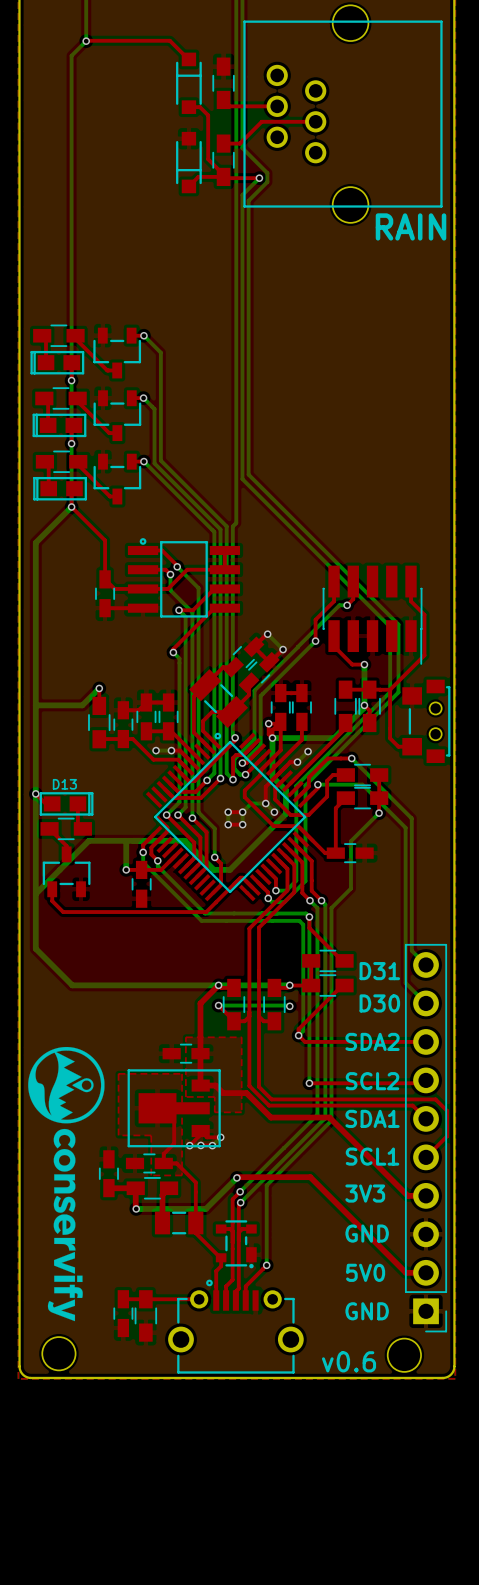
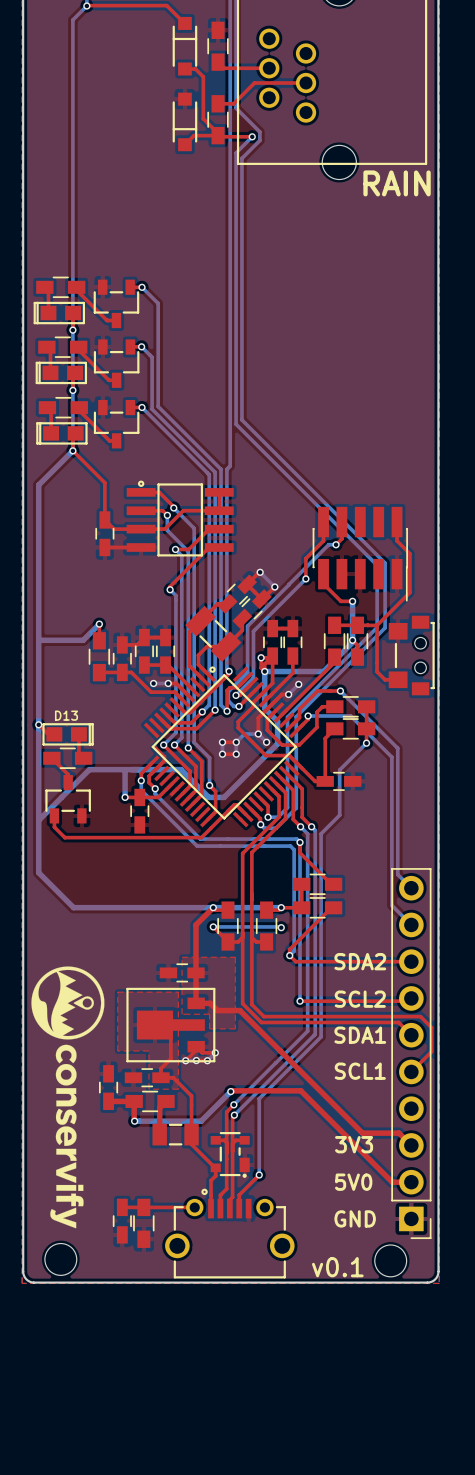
text: D31 (379, 971) -> none
text: D30 (379, 1003) -> none
top track: (270, 1117) (329, 1117) (407, 1195) (426, 1195) -> (263, 1033) (362, 1133) (399, 1133) (411, 1145)
text: 3V3 (365, 1193) -> none
text: GND (367, 1233) -> 3V3 (354, 1144)
text: v0.6 (349, 1361) -> v0.1 (337, 1267)

